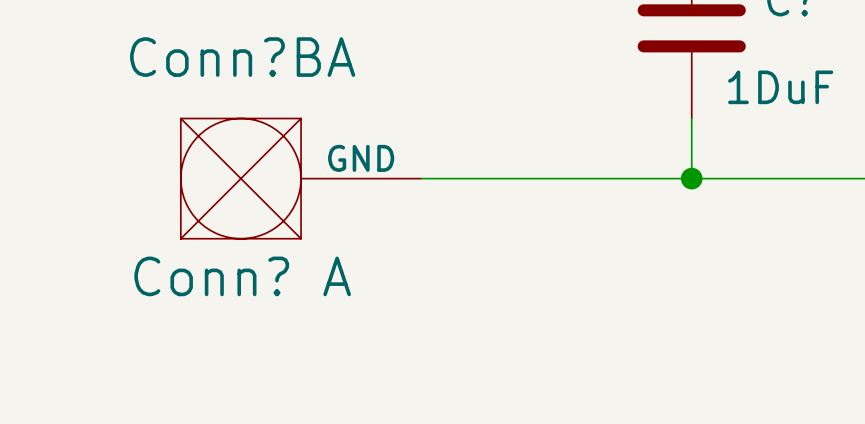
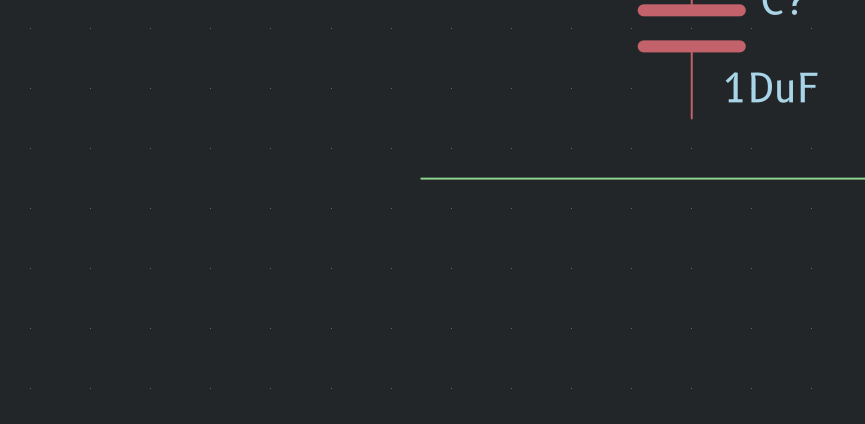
wire: (691, 118) (691, 178) -> none
Conn?BA: Conn? A (301, 178) -> none
junction: (691, 178) -> none

